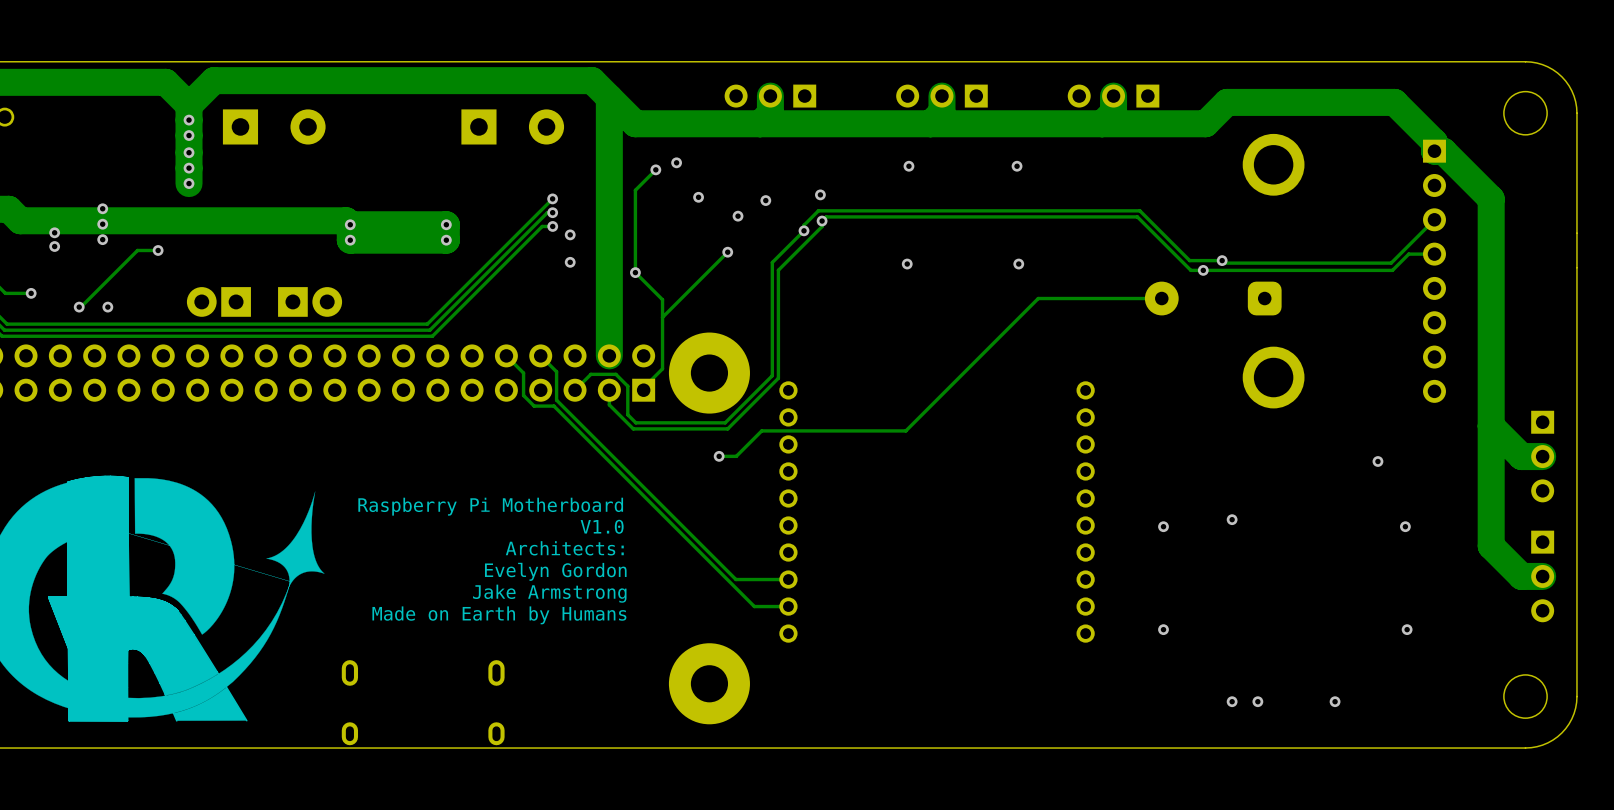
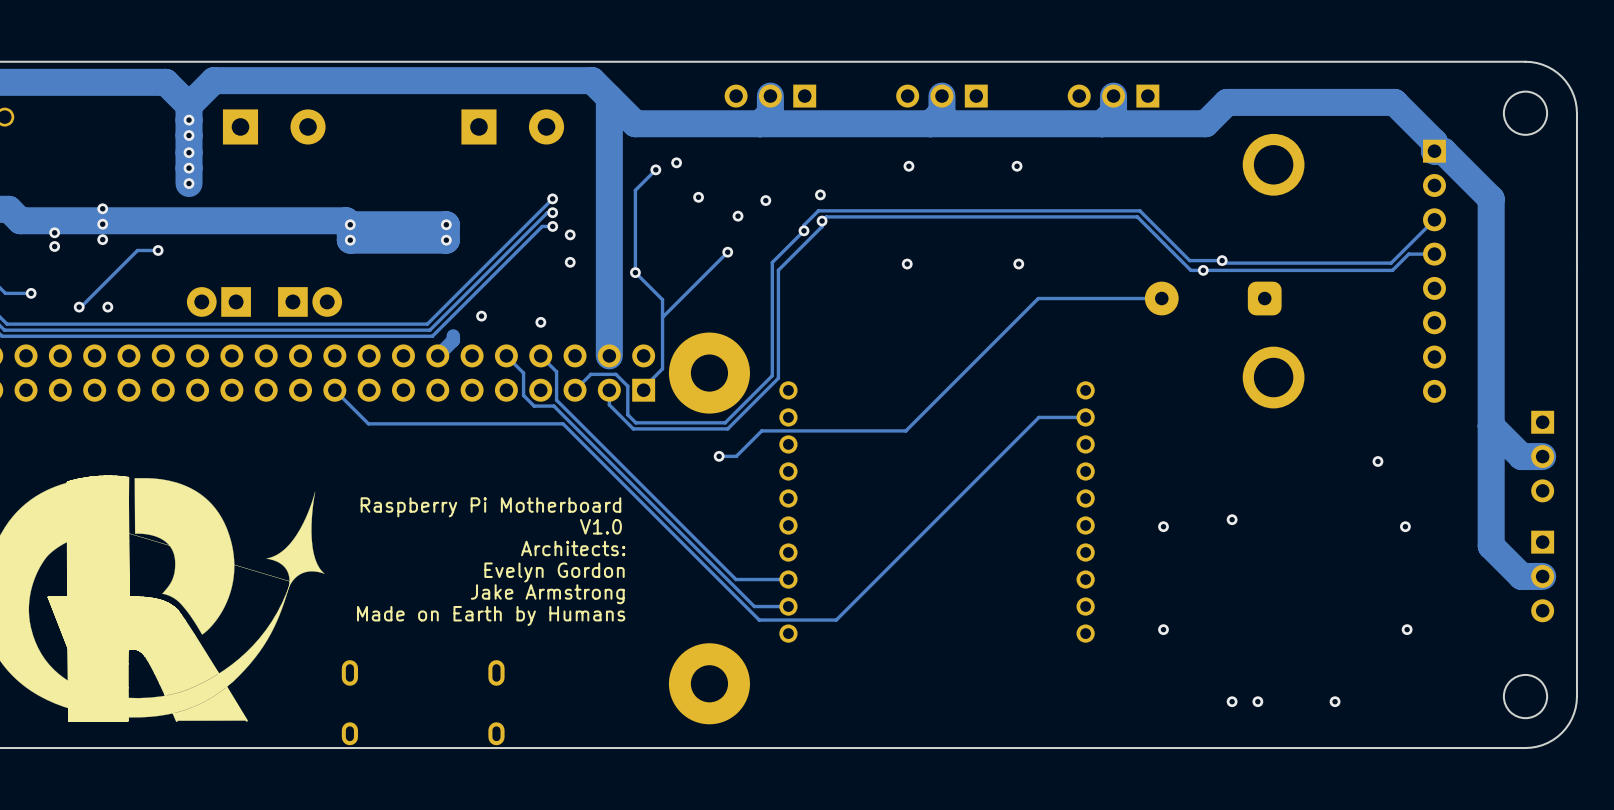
via: none -> (481, 316)
via: none -> (540, 322)
track: none -> (453, 335) (453, 340) (437, 355)
track: none -> (334, 390) (368, 423) (563, 423) (759, 620) (836, 620) (1038, 417) (1085, 417)

